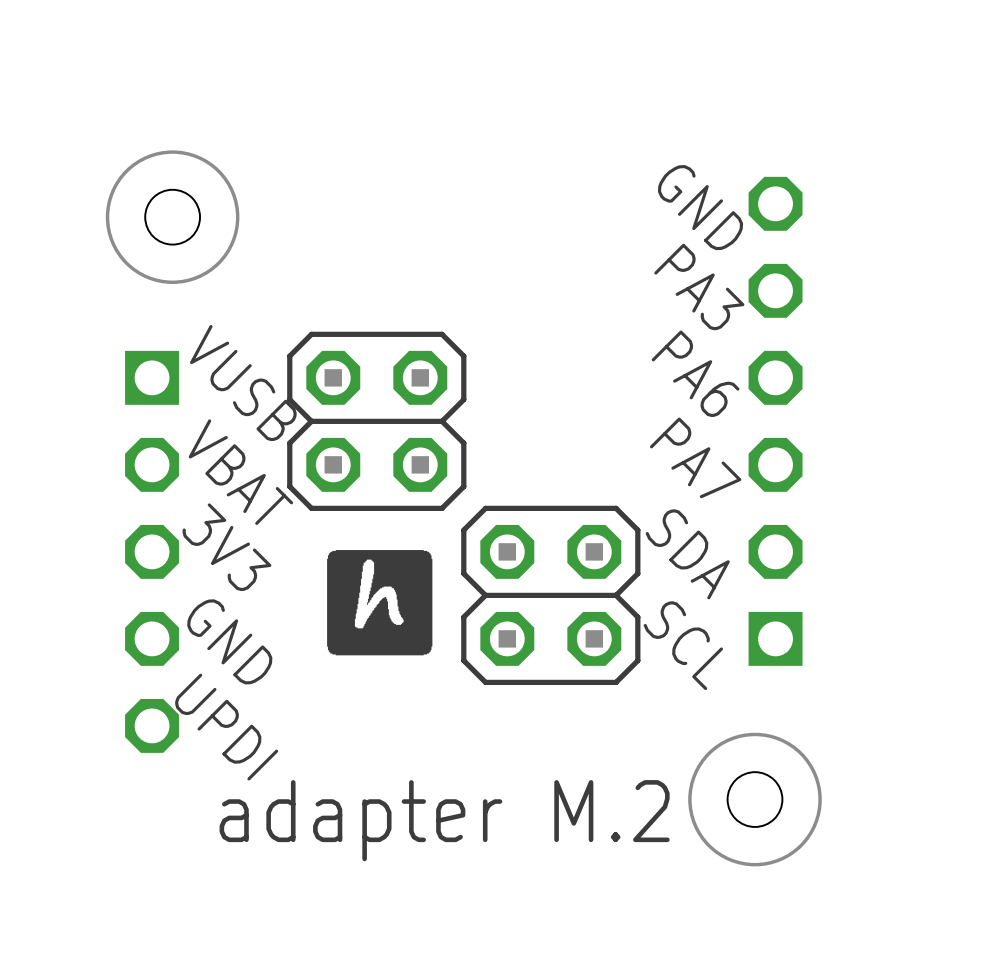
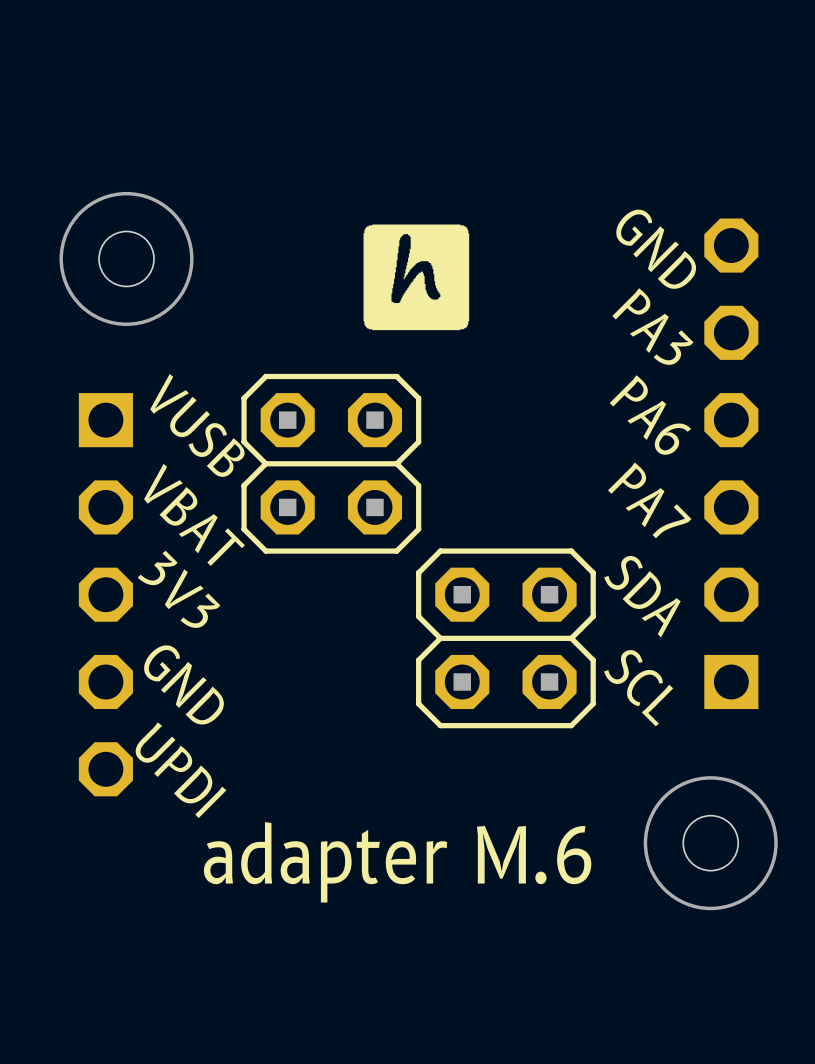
drawing: none -> [363, 224, 470, 331]
drawing: [327, 550, 433, 656] -> none
text: adapter M.2 (444, 820) -> adapter M.6 (397, 862)

